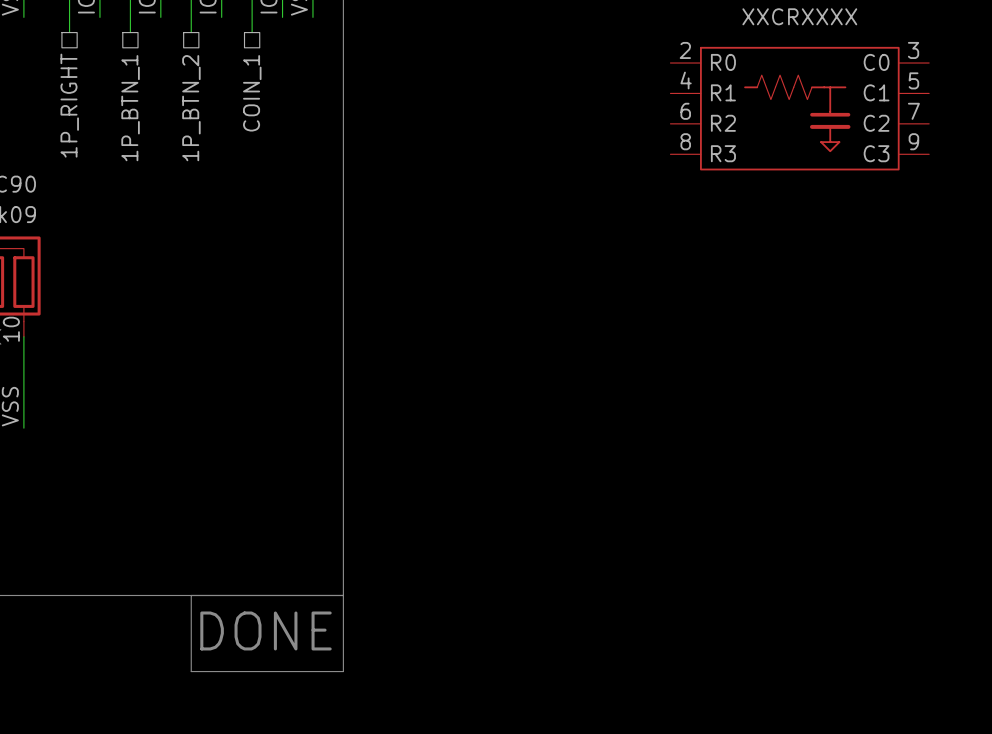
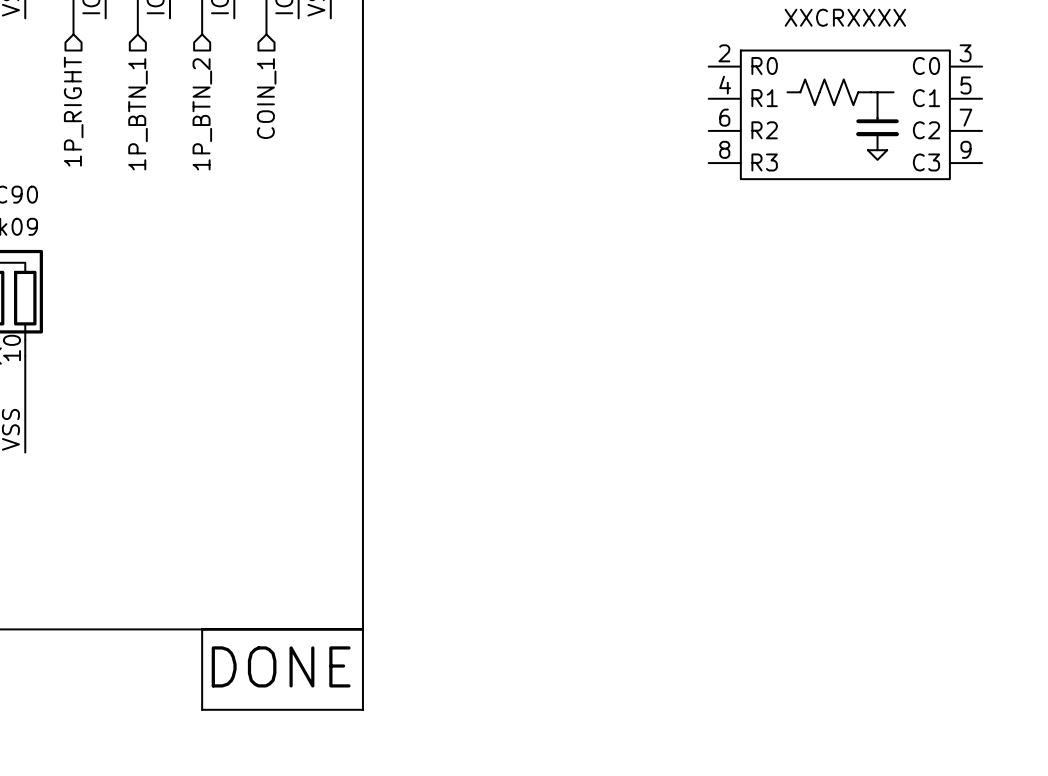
hierarchical label shape: passive (252, 93) -> input (266, 98)
hierarchical label shape: passive (69, 105) -> input (73, 111)
hierarchical label shape: passive (130, 108) -> input (138, 114)
hierarchical label shape: passive (191, 108) -> input (202, 114)

